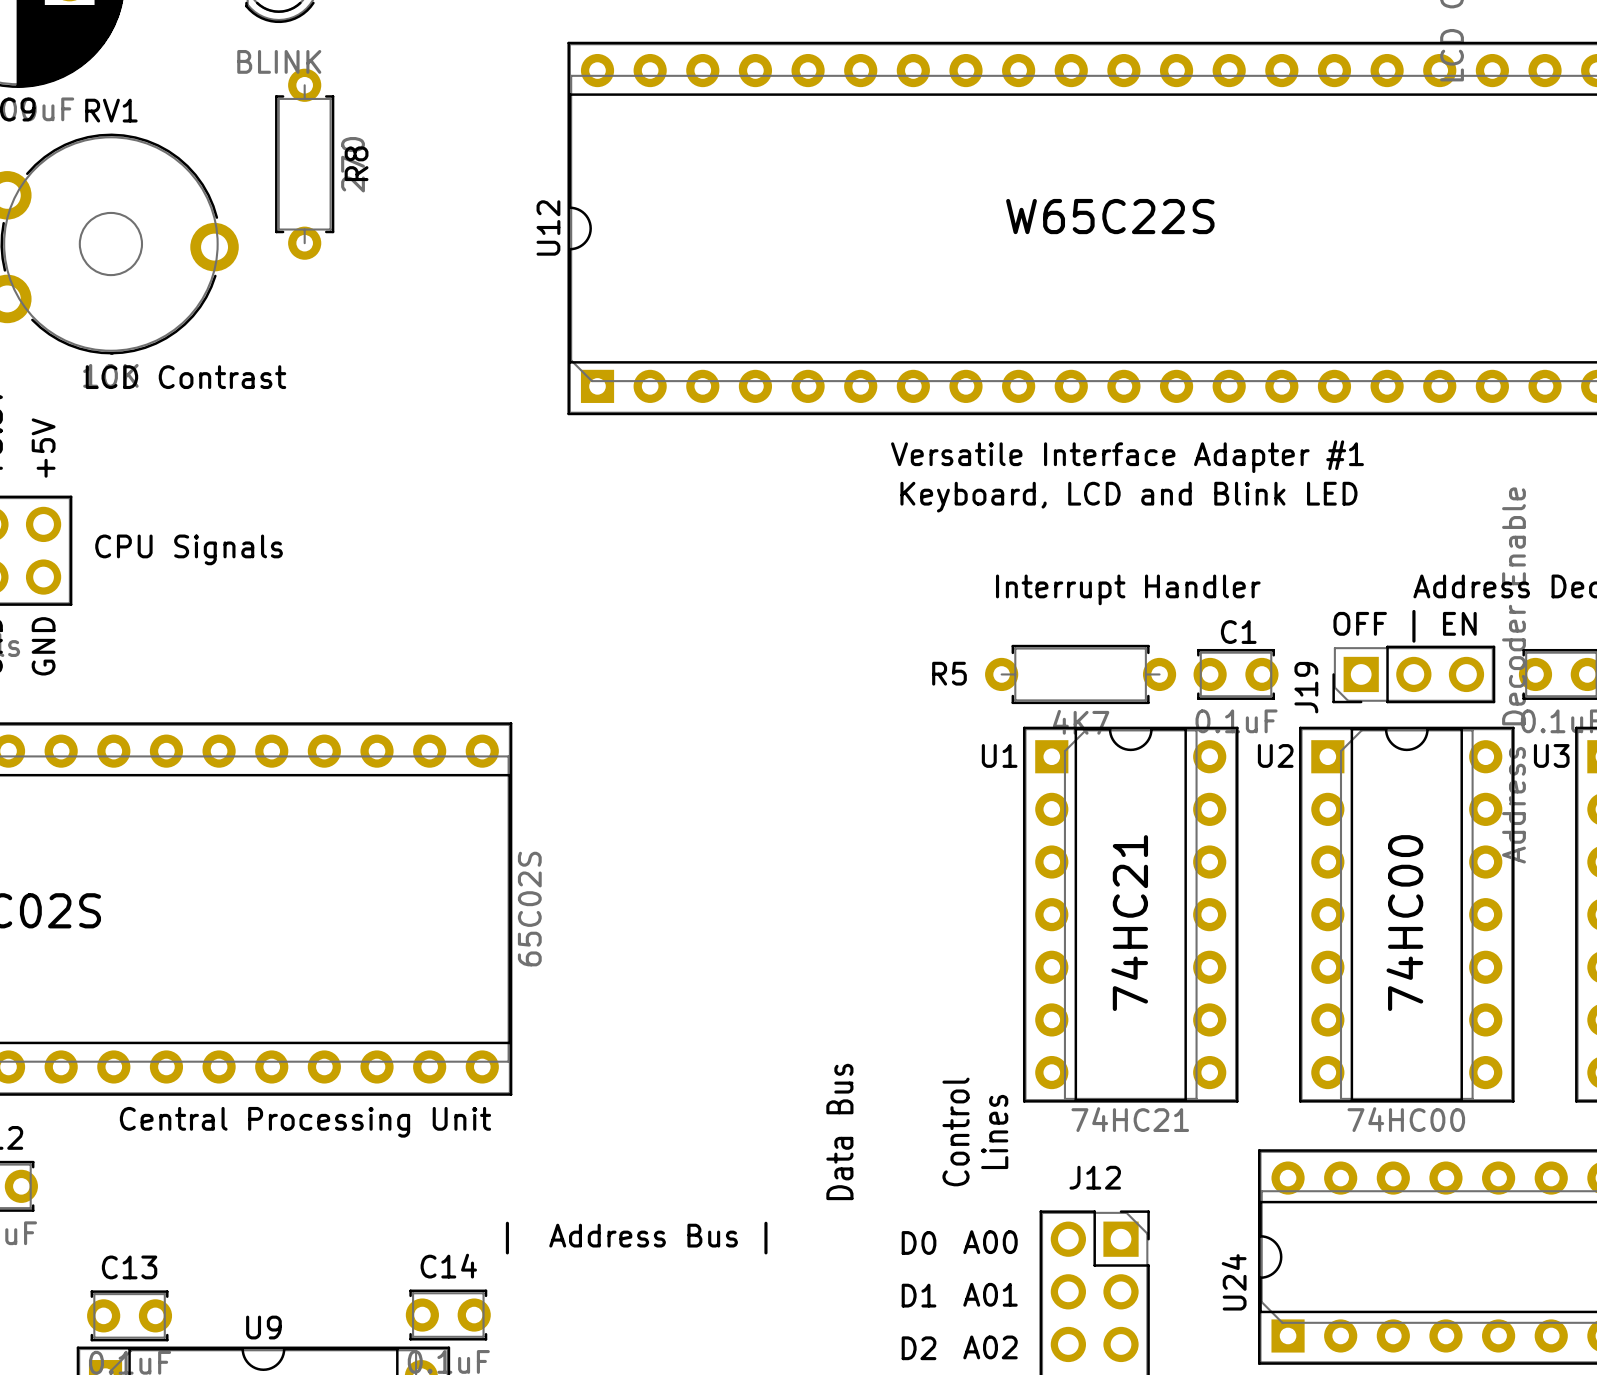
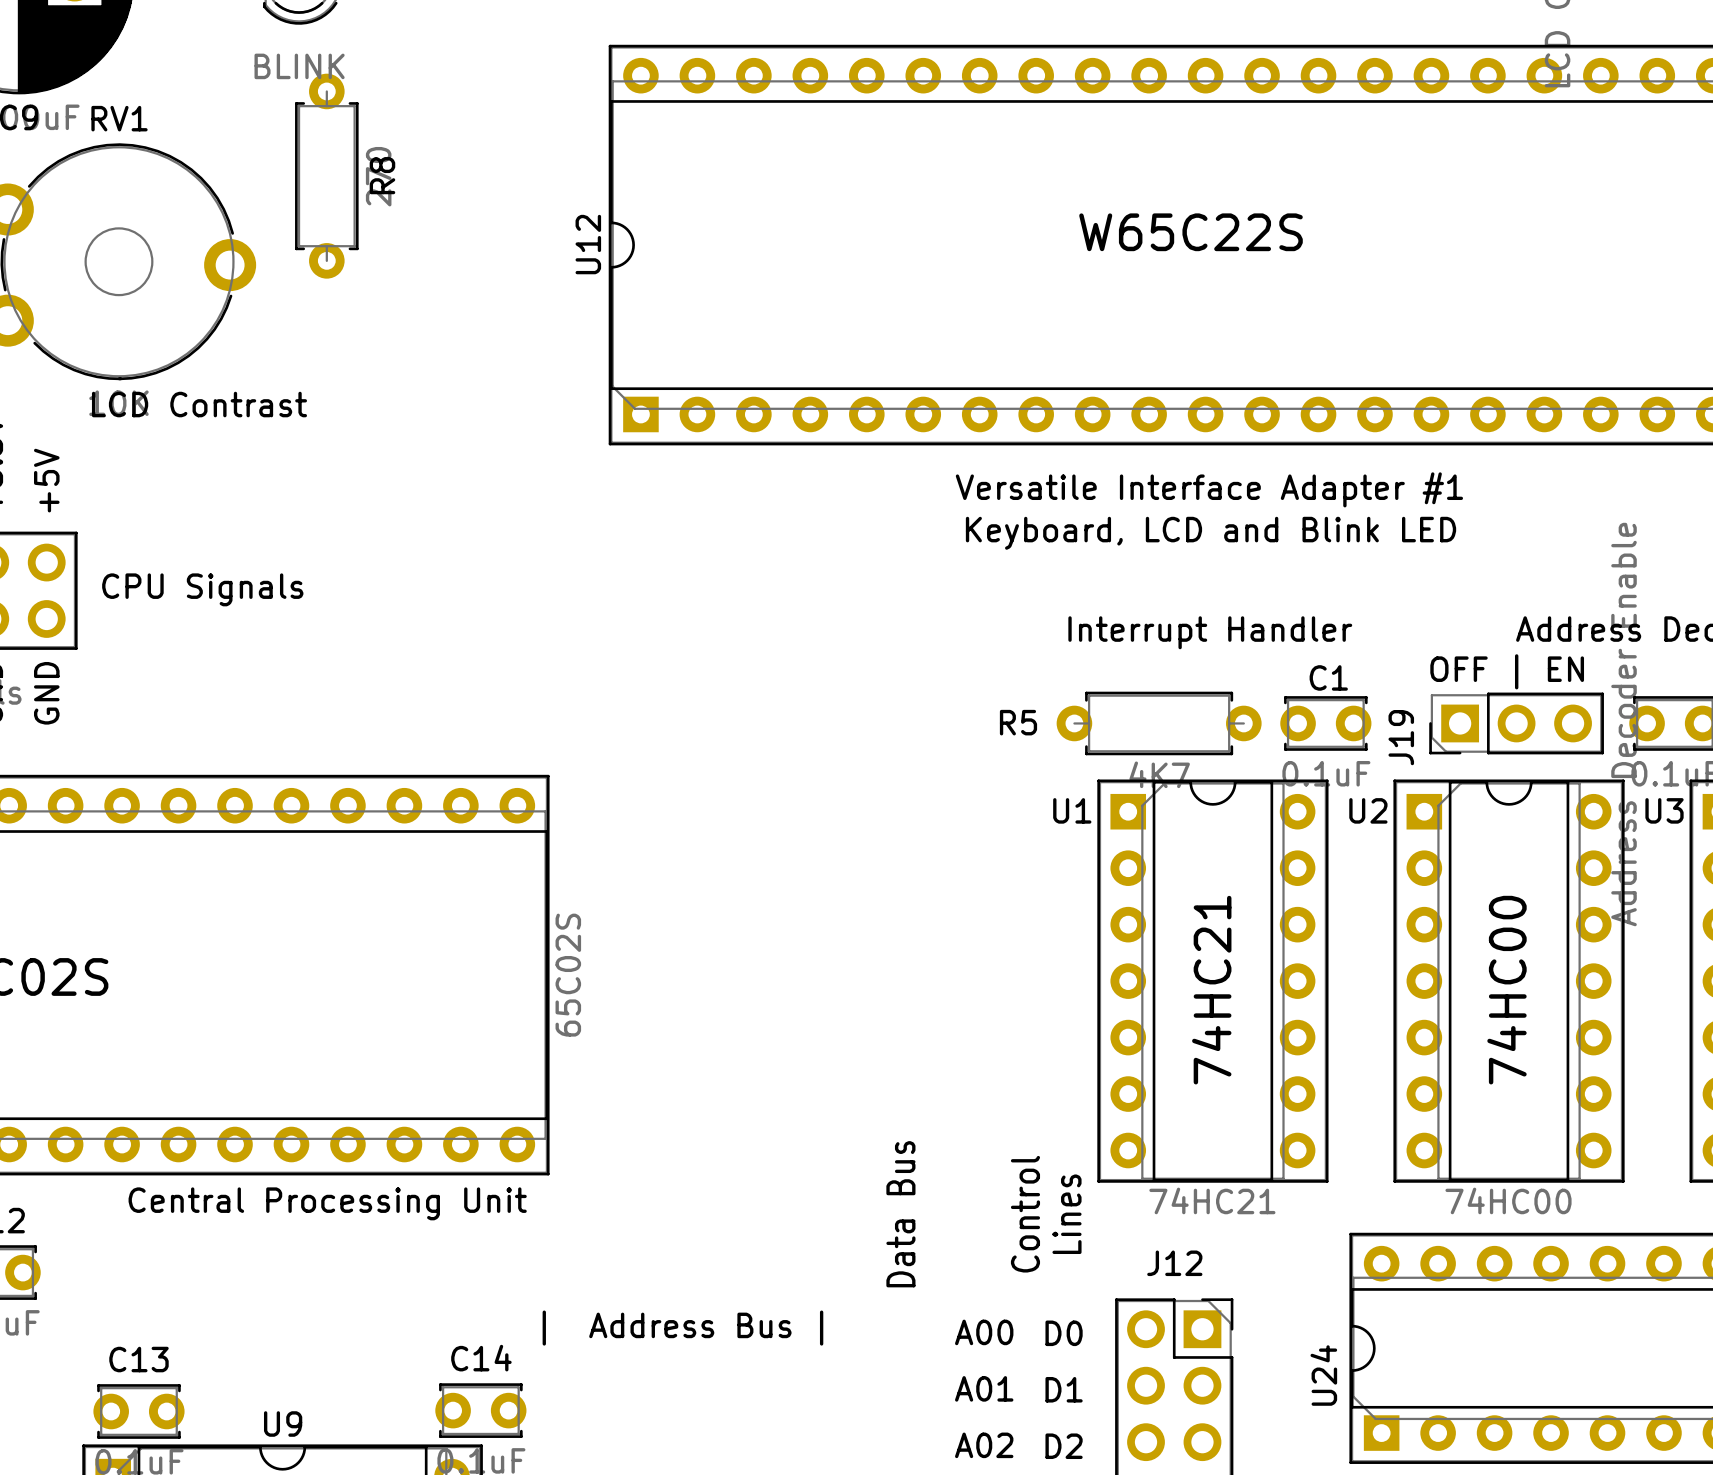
text: D0 (919, 1242) -> A00 (984, 1332)
text: A00 (990, 1242) -> D0 (1064, 1333)
text: A01 (990, 1294) -> D1 (1064, 1389)
text: D1 (919, 1295) -> A01 (984, 1388)
text: A02 (990, 1347) -> D2 (1064, 1446)
text: D2 (919, 1348) -> A02 (984, 1445)

